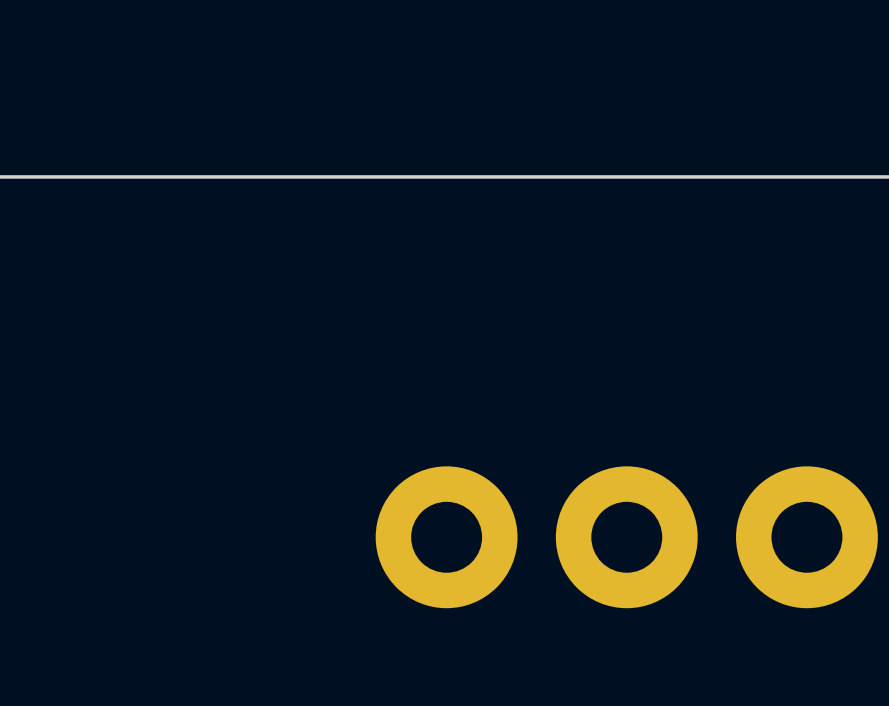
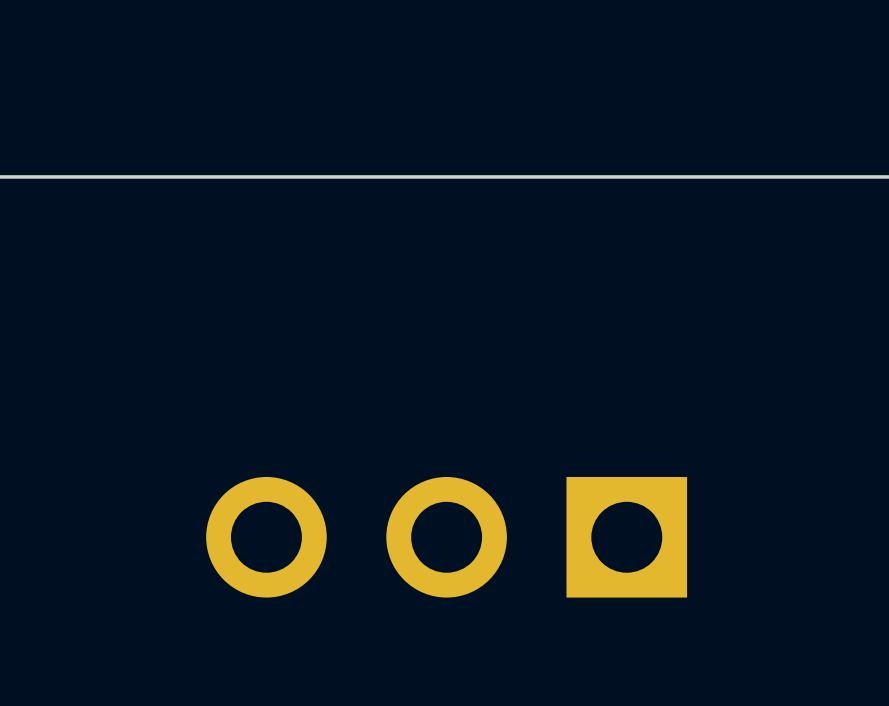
part footprint: [375, 466, 518, 609] -> [206, 476, 688, 598]
part: (626, 537) -> none
part: (806, 537) -> none

